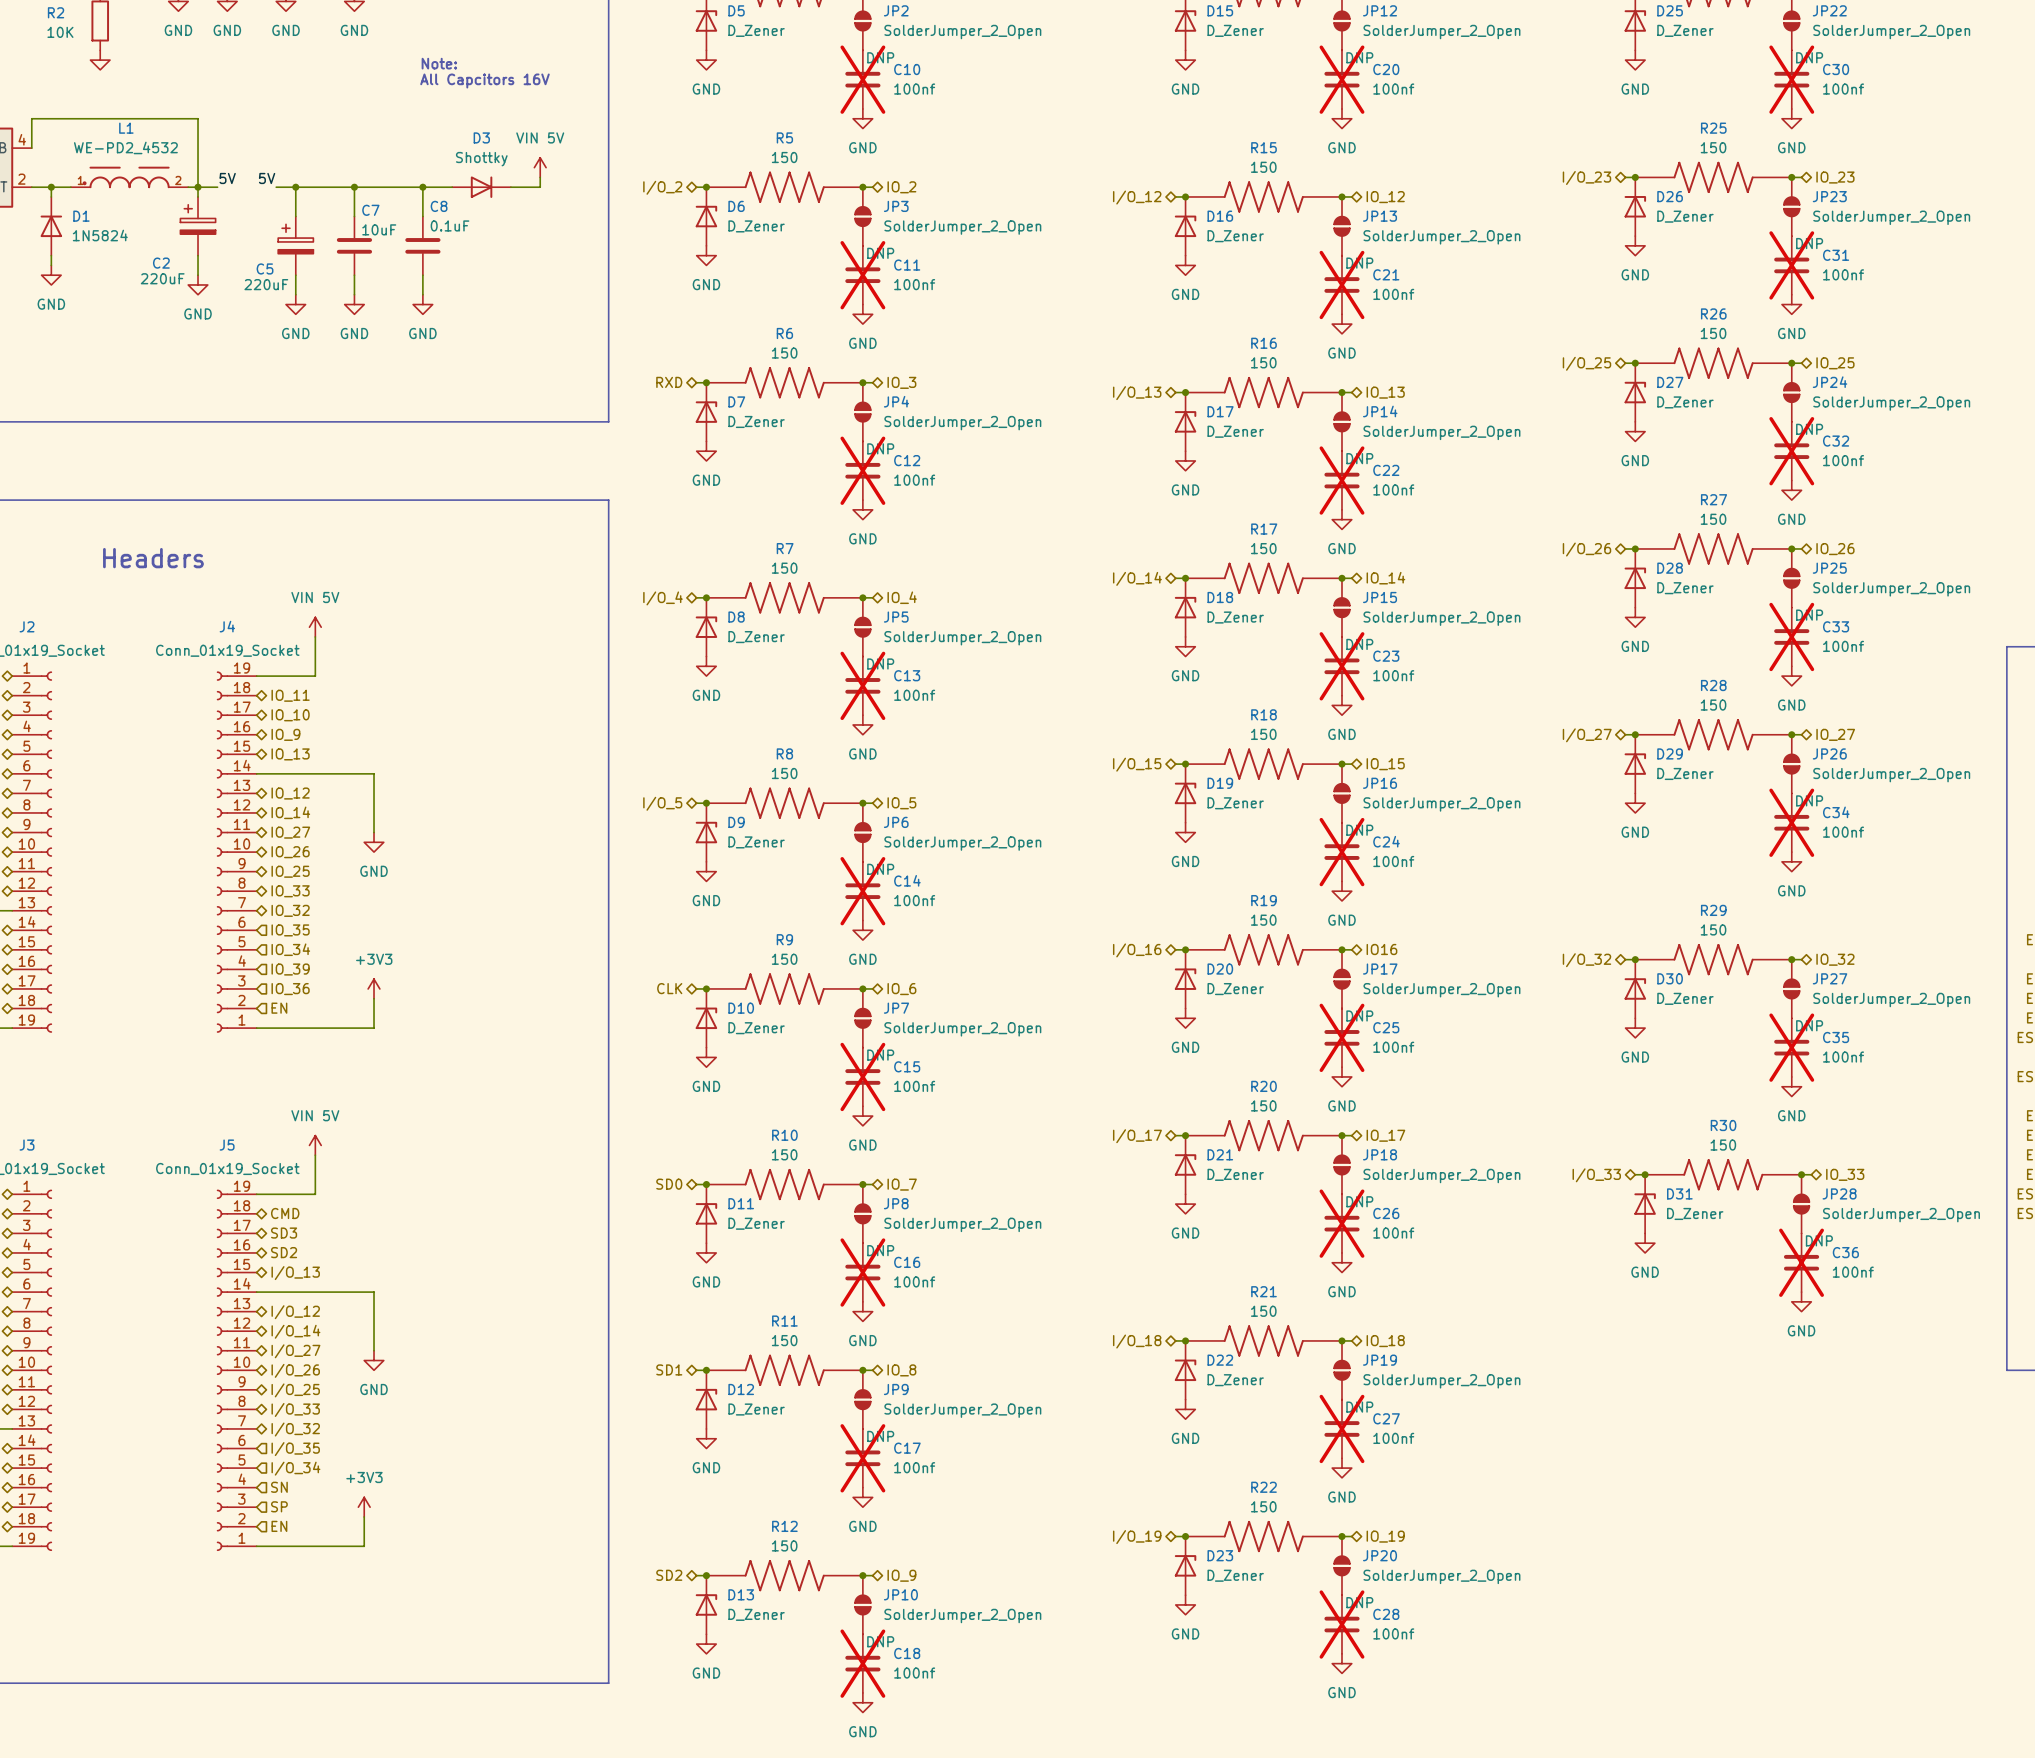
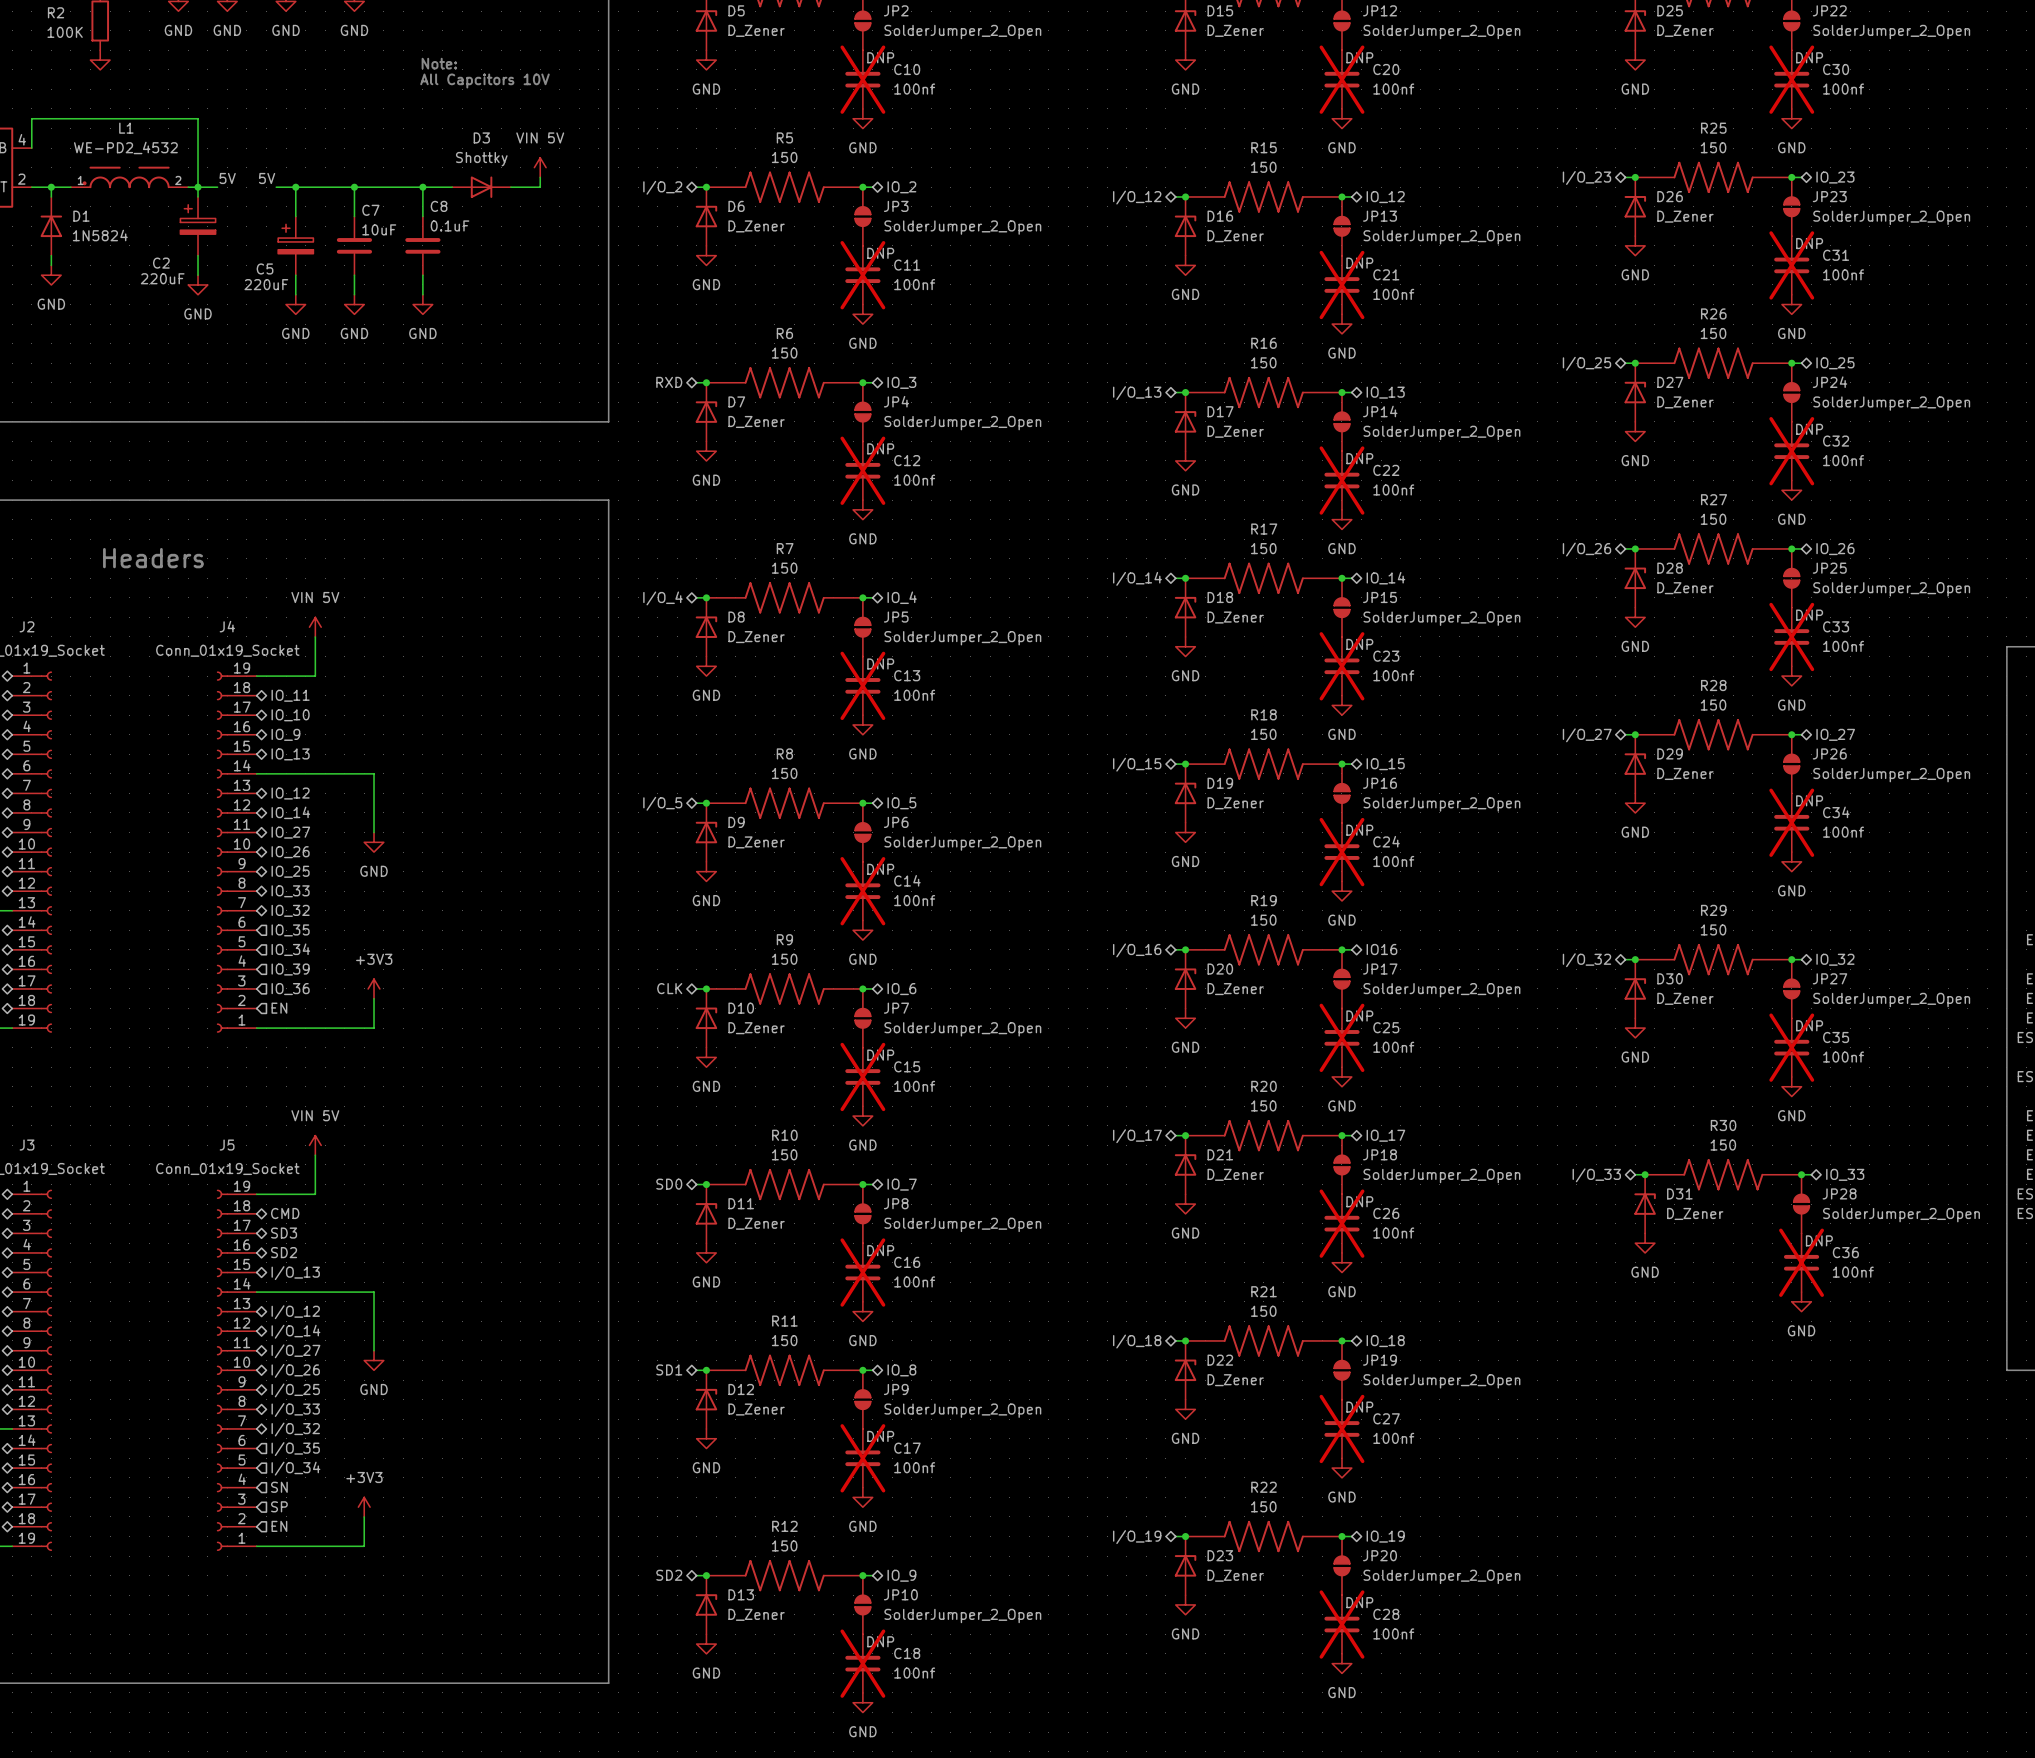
R2 value: 10K (60, 32) -> 100K (65, 32)
text: All Capcitors 16V (484, 80) -> All Capcitors 10V (484, 80)

